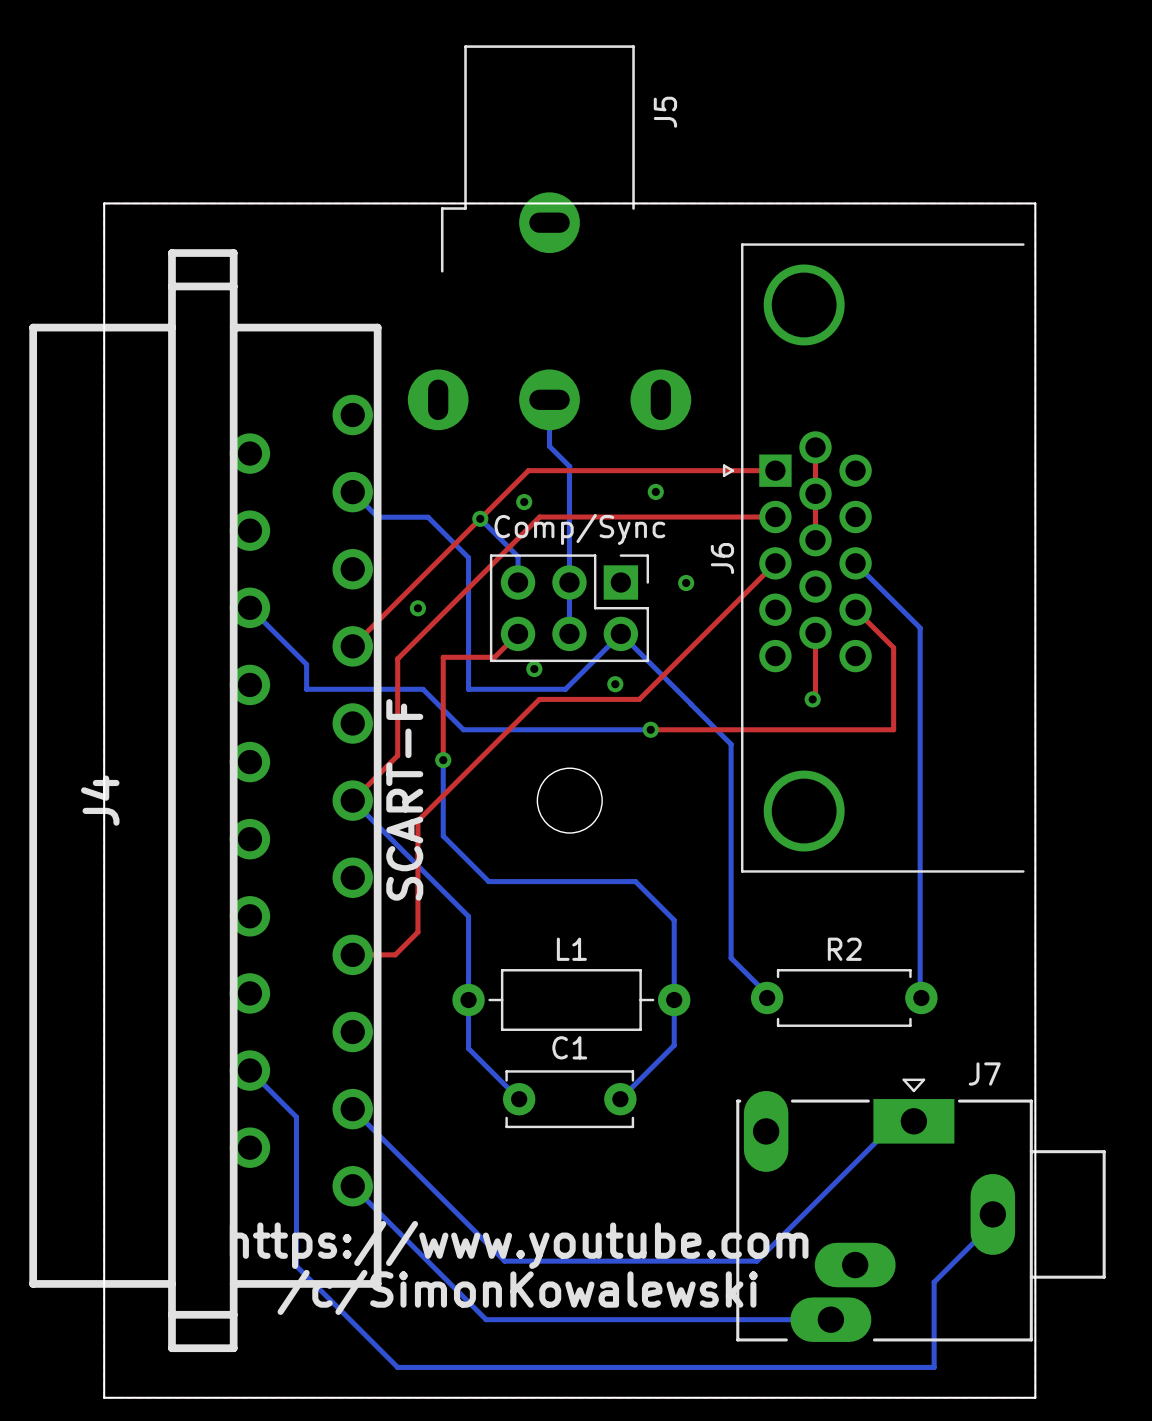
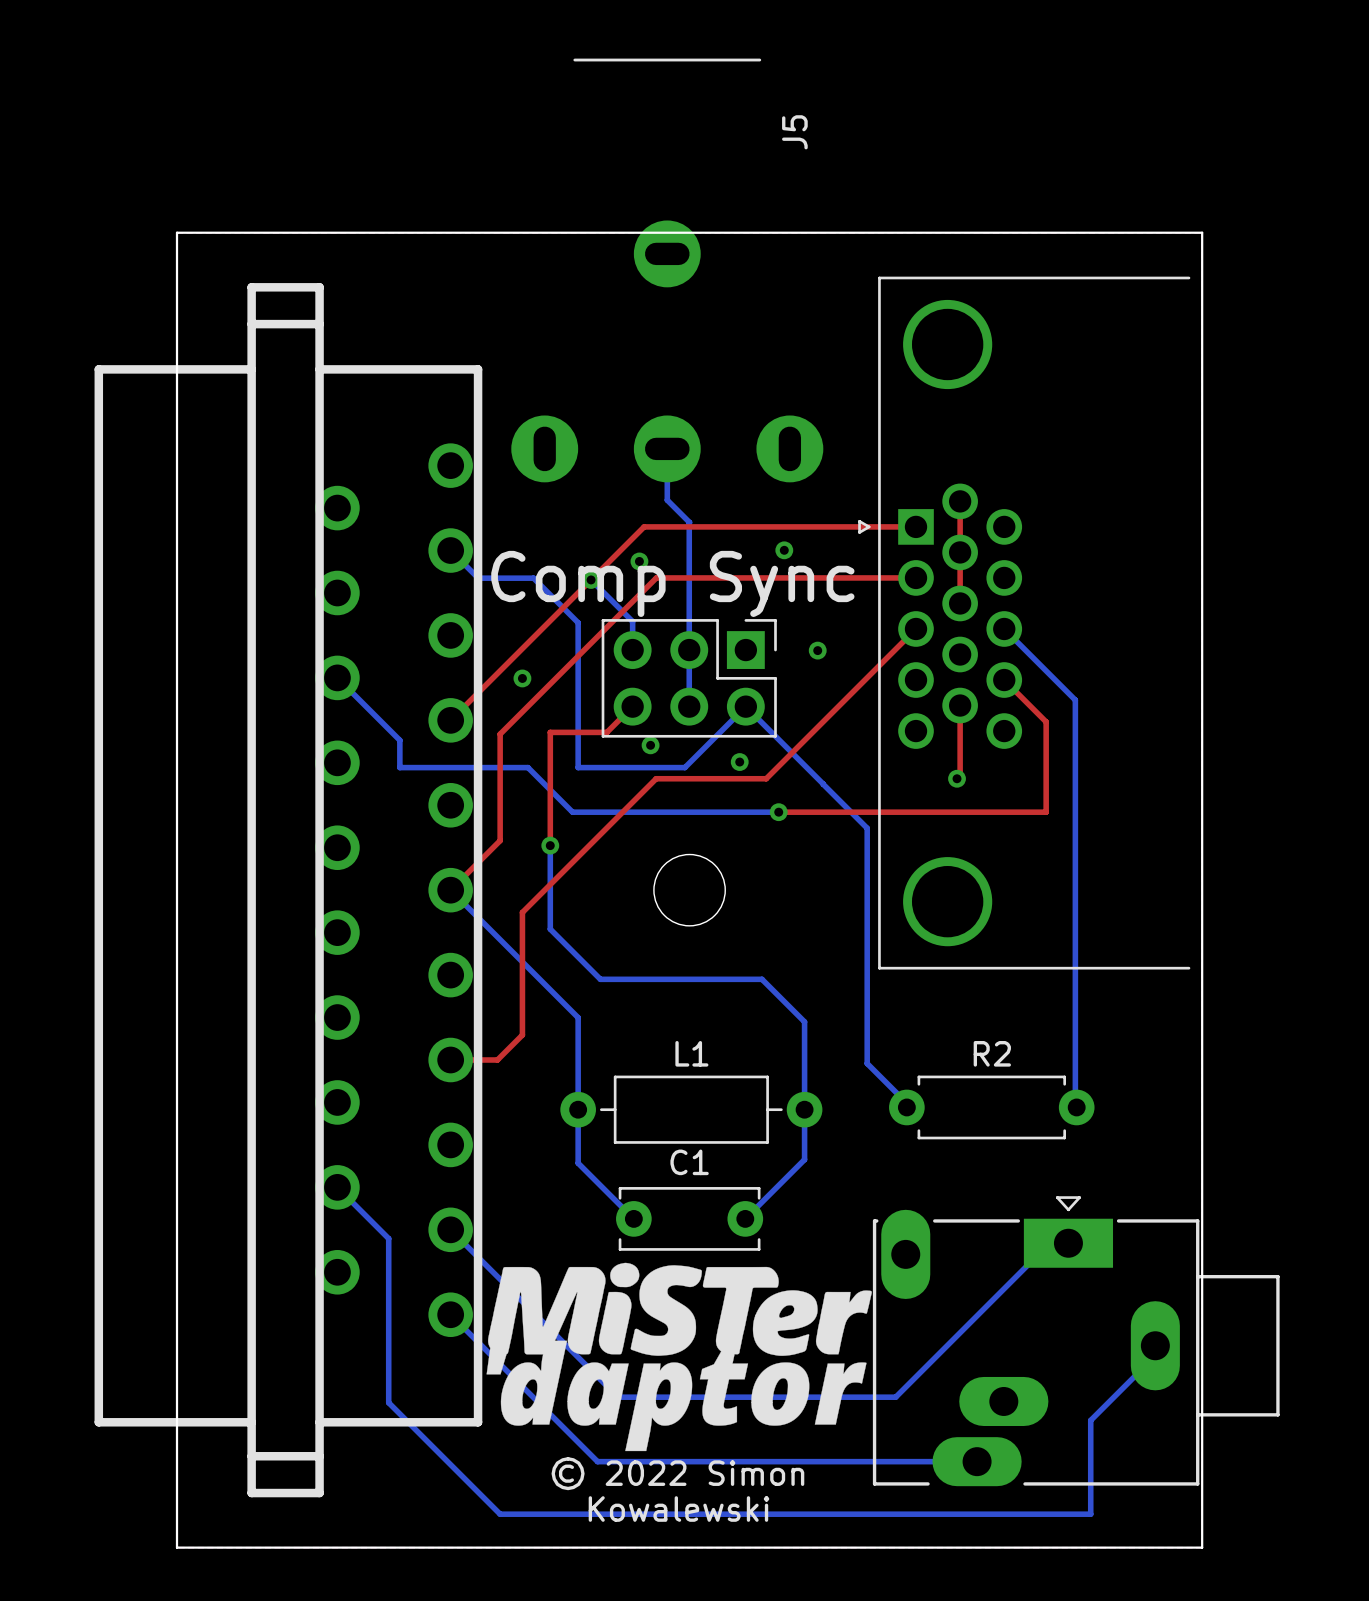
J5 footprint: [407, 45, 692, 431] -> [511, 58, 824, 483]
part value: Comp/Sync (579, 529) -> Comp Sync (672, 583)
J6 name: J6 (722, 558) -> none
J4 value: SCART-F (404, 799) -> none
J4 name: J4 (100, 800) -> none
J7 name: J7 (984, 1074) -> none
drawing: none -> [486, 1262, 872, 1452]
text: https://www.youtube.com (519, 1244) -> none
text: /c/SimonKowalewski (517, 1292) -> none
text: none -> © 2022 Simon (677, 1473)
text: none -> Kowalewski (678, 1509)

